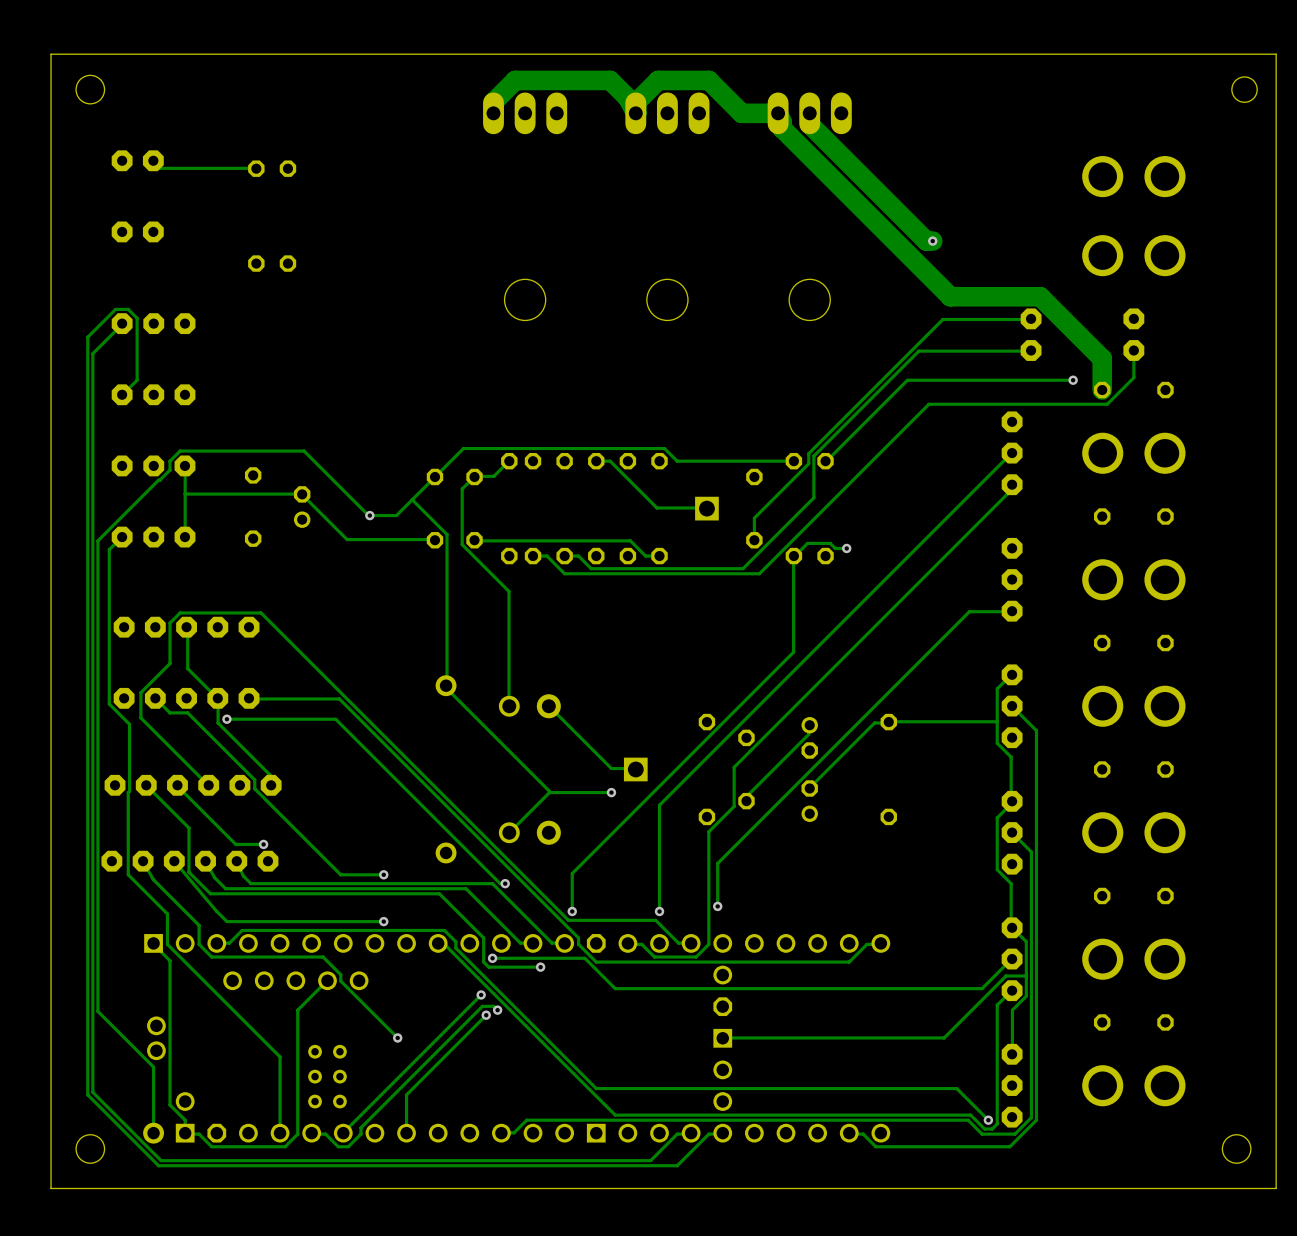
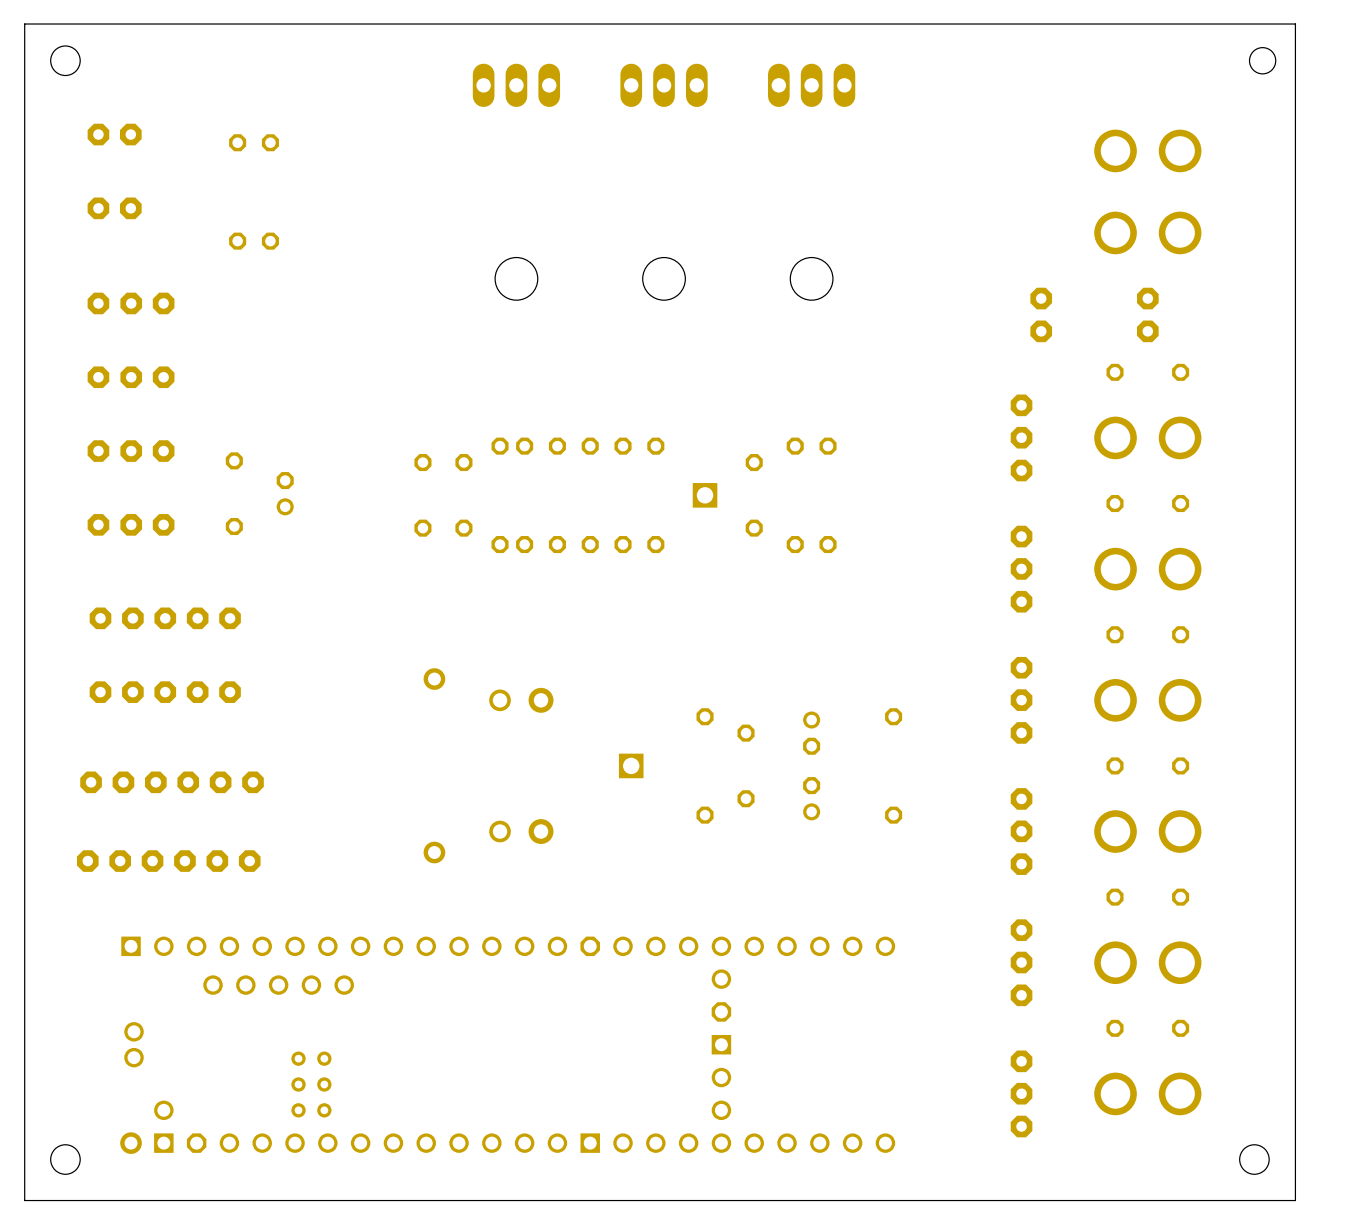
track: (493, 113) (493, 101) (515, 80) (610, 80) (627, 98) (635, 113) (636, 101) (658, 80) (708, 80) (741, 113) (778, 113) (782, 122) (782, 128) (950, 296) (1040, 296) (1102, 358) (1102, 390) -> none
track: (809, 113) (810, 124) (926, 241) (932, 241) -> none
track: (153, 160) (160, 168) (256, 168) -> none
via: (932, 241) -> none
track: (1031, 318) (942, 319) (808, 453) (808, 463) (754, 518) (754, 540) -> none
track: (122, 323) (92, 353) (92, 1092) (161, 1160) (650, 1160) (677, 1134) (691, 1133) -> none
track: (1031, 350) (918, 351) (813, 456) (813, 497) (743, 568) (591, 568) (578, 556) (564, 556) -> none
track: (1133, 350) (1133, 377) (1107, 404) (928, 404) (759, 573) (564, 573) (546, 556) (533, 556) -> none
track: (1073, 380) (907, 380) (825, 461) -> none
via: (1073, 380) -> none
track: (122, 394) (137, 380) (137, 318) (128, 309) (115, 309) (87, 337) (87, 1094) (158, 1165) (677, 1165) (708, 1134) (722, 1133) -> none
track: (1012, 453) (659, 805) (659, 911) -> none
track: (509, 461) (493, 476) (474, 476) (462, 489) (462, 544) (508, 591) (509, 706) -> none
track: (596, 461) (610, 461) (656, 507) (706, 508) -> none
track: (793, 461) (677, 461) (664, 448) (463, 448) (396, 515) (368, 515) (304, 451) (180, 451) (170, 461) (170, 470) (97, 540) (97, 1011) (153, 1067) (153, 1133) -> none
track: (184, 465) (185, 537) -> none
track: (1012, 484) (1011, 490) (734, 767) (734, 806) (708, 831) (708, 944) (696, 957) (654, 957) (641, 944) (627, 943) -> none
track: (185, 494) (301, 494) (347, 539) (435, 540) -> none
track: (412, 499) (447, 534) (447, 688) (549, 792) -> none
via: (369, 515) -> none
track: (121, 537) (109, 549) (109, 704) (129, 724) (128, 874) (167, 914) (167, 944) (280, 1056) (280, 1133) -> none
track: (474, 540) (630, 540) (645, 556) (659, 556) -> none
track: (846, 548) (835, 548) (830, 543) (807, 543) (793, 556) (793, 652) (572, 873) (572, 911) -> none
via: (846, 548) -> none
track: (1012, 611) (969, 611) (717, 863) (717, 906) -> none
track: (186, 627) (187, 668) (217, 698) (218, 723) (269, 774) (271, 785) -> none
track: (1012, 674) (997, 688) (997, 743) (1011, 757) (1012, 802) (997, 817) (997, 869) (1011, 883) (1011, 926) (1026, 941) (1026, 996) (1012, 1010) (1012, 1054) -> none
track: (155, 698) (170, 712) (187, 712) (254, 779) (254, 788) (340, 874) (383, 874) -> none
track: (249, 698) (339, 698) (578, 938) (578, 944) (596, 962) (849, 962) (866, 944) (880, 943) -> none
track: (548, 706) (611, 768) (635, 769) -> none
track: (1012, 706) (1036, 730) (1036, 1120) (1009, 1146) (875, 1146) (863, 1134) (849, 1133) -> none
track: (226, 719) (335, 719) (500, 883) (505, 883) -> none
via: (226, 719) -> none
track: (997, 721) (874, 723) (809, 788) -> none
track: (809, 725) (808, 734) (746, 796) (746, 801) -> none
track: (146, 785) (188, 828) (188, 872) (210, 893) (439, 893) (483, 938) (483, 962) (488, 967) (540, 967) -> none
track: (177, 785) (235, 844) (263, 844) -> none
track: (208, 785) (140, 717) (140, 692) (170, 663) (170, 623) (180, 612) (261, 612) (568, 920) (655, 920) (678, 943) (691, 943) -> none
track: (549, 792) (509, 832) -> none
track: (611, 792) (549, 792) -> none
via: (611, 792) -> none
track: (1012, 832) (1031, 852) (1031, 1117) (1014, 1134) (982, 1134) (968, 1120) (526, 1120) (514, 1132) (501, 1133) -> none
via: (263, 844) -> none
track: (143, 861) (153, 879) (199, 925) (199, 944) (211, 957) (323, 957) (340, 974) (340, 981) (397, 1037) -> none
track: (174, 861) (226, 921) (383, 921) -> none
track: (205, 861) (214, 877) (225, 888) (465, 888) (520, 943) (533, 943) -> none
track: (236, 861) (243, 876) (250, 883) (492, 883) (552, 943) (564, 943) -> none
via: (383, 874) -> none
via: (505, 883) -> none
via: (717, 906) -> none
via: (572, 911) -> none
via: (659, 911) -> none
via: (383, 921) -> none
track: (153, 943) (170, 960) (170, 1105) (185, 1120) (185, 1133) (199, 1134) (211, 1146) (285, 1146) (297, 1134) (297, 1010) (327, 980) -> none
track: (216, 943) (229, 943) (242, 930) (444, 930) (455, 941) (455, 948) (596, 1088) (956, 1088) (988, 1120) -> none
track: (438, 943) (444, 944) (615, 1115) (970, 1115) (984, 1129) (992, 1129) (997, 1123) (997, 1005) (1012, 990) -> none
track: (492, 958) (584, 958) (615, 988) (982, 988) (1012, 959) -> none
via: (492, 958) -> none
via: (540, 967) -> none
track: (1026, 975) (1006, 975) (944, 1037) (722, 1038) -> none
track: (481, 994) (343, 1133) -> none
via: (481, 994) -> none
track: (497, 1010) (493, 1006) (482, 1006) (361, 1127) (361, 1134) (348, 1146) (338, 1146) (325, 1134) (311, 1133) -> none
via: (497, 1010) -> none
track: (486, 1015) (406, 1094) (406, 1133) -> none
via: (486, 1015) -> none
via: (397, 1037) -> none
via: (988, 1120) -> none

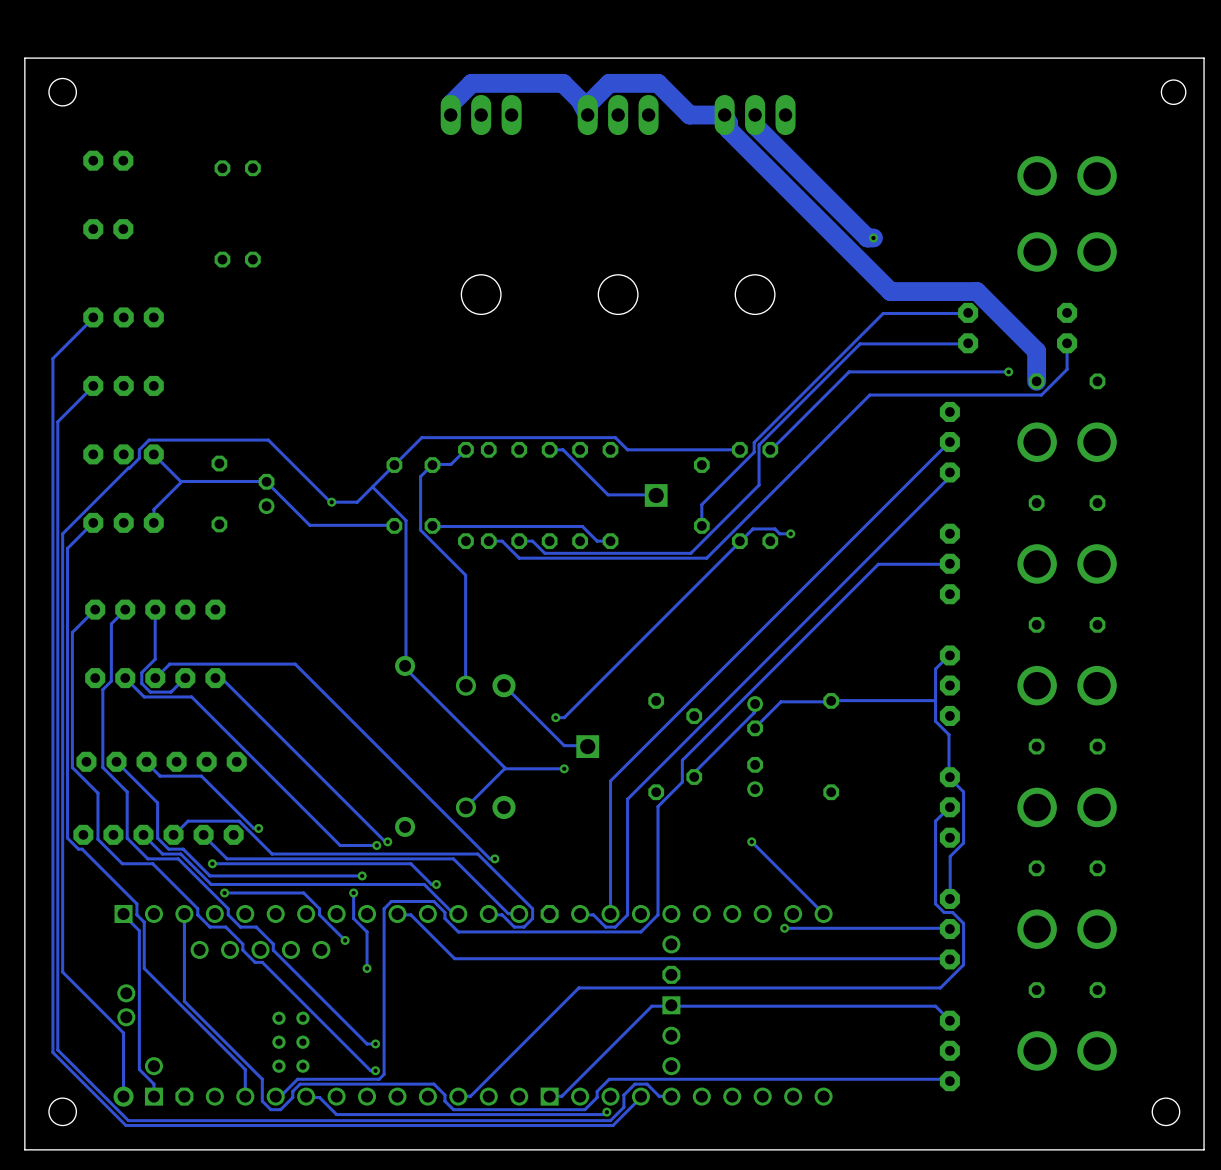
track: none -> (450, 115) (451, 104) (471, 83) (563, 83) (580, 100) (587, 115) (588, 104) (609, 83) (658, 83) (689, 115) (724, 115) (728, 123) (728, 129) (890, 291) (976, 291) (1036, 351) (1036, 381)
track: none -> (755, 115) (755, 125) (867, 237) (873, 237)
via: none -> (873, 237)
track: none -> (968, 312) (883, 313) (754, 442) (754, 452) (701, 504) (701, 525)
track: none -> (93, 317) (52, 358) (52, 1052) (125, 1125) (612, 1125) (640, 1096)
track: none -> (968, 343) (860, 343) (759, 444) (759, 485) (690, 553) (544, 553) (532, 541) (519, 541)
track: none -> (1067, 343) (1067, 369) (1041, 395) (869, 395) (706, 558) (519, 558) (502, 541) (488, 541)
track: none -> (1008, 371) (849, 371) (770, 449)
via: none -> (1008, 371)
track: none -> (93, 385) (57, 421) (57, 1050) (128, 1120) (610, 1120) (623, 1107) (623, 1095) (634, 1084) (647, 1084) (659, 1096) (671, 1096)
track: none -> (949, 442) (610, 780) (610, 913)
track: none -> (465, 449) (451, 464) (432, 464) (420, 476) (420, 530) (465, 575) (465, 685)
track: none -> (549, 449) (563, 449) (608, 494) (656, 495)
track: none -> (739, 449) (627, 449) (615, 437) (421, 437) (357, 502) (330, 502) (268, 440) (149, 440) (139, 449) (139, 458) (62, 533) (62, 972) (123, 1032) (123, 1096)
track: none -> (153, 454) (180, 481)
track: none -> (949, 472) (948, 477) (627, 799) (627, 914) (615, 927) (605, 927) (593, 914) (580, 913)
track: none -> (180, 481) (265, 481) (309, 525) (394, 525)
track: none -> (180, 481) (153, 509) (153, 522)
track: none -> (372, 486) (405, 520) (405, 668) (504, 768)
via: none -> (331, 502)
track: none -> (93, 522) (67, 548) (67, 838) (78, 849) (82, 849) (136, 903) (136, 914) (144, 922) (144, 968) (245, 1069) (245, 1096)
track: none -> (432, 525) (582, 526) (597, 541) (610, 541)
track: none -> (790, 533) (779, 533) (774, 528) (752, 528) (564, 717) (555, 717)
via: none -> (790, 533)
track: none -> (949, 563) (878, 564) (682, 760) (682, 782) (658, 806) (658, 914) (640, 931) (458, 931) (444, 918) (444, 912) (433, 901) (391, 901) (384, 908) (384, 1074) (379, 1079) (297, 1079) (280, 1096) (275, 1096)
track: none -> (95, 609) (72, 632) (72, 767) (97, 793) (97, 839) (122, 863) (152, 863) (197, 908) (197, 914) (209, 927) (225, 927) (242, 944) (242, 950) (255, 962) (262, 962) (370, 1070) (375, 1070)
track: none -> (125, 609) (111, 623) (111, 681) (102, 689) (102, 767) (127, 791) (127, 838) (147, 858) (178, 858) (228, 908) (228, 914) (240, 927) (256, 927) (273, 944) (273, 950) (367, 1043) (375, 1043)
track: none -> (155, 609) (155, 659) (141, 672) (141, 683) (150, 692) (171, 692) (185, 678)
track: none -> (949, 655) (935, 668) (935, 721) (948, 734) (948, 776) (963, 791) (963, 843) (950, 856) (949, 898)
track: none -> (125, 678) (144, 696) (191, 696) (340, 845) (376, 845)
track: none -> (155, 678) (169, 664) (295, 664) (489, 858) (494, 858)
track: none -> (215, 678) (222, 678) (385, 841) (387, 841)
track: none -> (503, 685) (564, 745) (587, 746)
track: none -> (935, 700) (780, 701) (755, 728)
track: none -> (755, 703) (754, 712) (694, 772) (694, 777)
via: none -> (555, 717)
track: none -> (116, 761) (157, 802) (157, 838) (168, 849) (183, 849) (209, 875) (362, 875)
track: none -> (146, 761) (160, 776) (201, 776) (253, 828) (258, 828)
track: none -> (504, 768) (465, 807)
track: none -> (564, 768) (504, 768)
via: none -> (564, 768)
track: none -> (949, 807) (935, 821) (935, 903) (944, 912) (952, 912) (963, 923) (963, 964) (940, 987) (578, 987) (470, 1096) (458, 1096)
via: none -> (258, 828)
track: none -> (143, 834) (162, 854) (180, 854) (211, 884) (424, 884) (453, 913) (458, 913)
track: none -> (173, 834) (188, 821) (239, 821) (272, 854) (477, 854) (532, 908) (532, 918) (524, 927) (514, 927) (502, 914) (488, 913)
track: none -> (203, 834) (227, 858) (453, 858) (508, 913) (519, 913)
via: none -> (387, 841)
track: none -> (751, 841) (823, 913)
via: none -> (751, 841)
via: none -> (376, 845)
via: none -> (494, 858)
track: none -> (212, 863) (410, 863) (431, 884) (436, 884)
via: none -> (212, 863)
via: none -> (362, 875)
via: none -> (436, 884)
track: none -> (224, 892) (303, 892) (319, 908) (319, 914) (345, 940)
via: none -> (224, 892)
track: none -> (353, 892) (353, 918) (367, 931) (367, 968)
via: none -> (353, 892)
track: none -> (123, 913) (139, 930) (139, 1069) (153, 1084) (153, 1096)
track: none -> (184, 913) (184, 1001) (262, 1079) (262, 1101) (270, 1109) (280, 1109) (292, 1097) (292, 1091) (300, 1084) (433, 1084) (444, 1095) (444, 1101) (453, 1109) (584, 1109) (597, 1097) (597, 1091) (609, 1079) (947, 1079) (949, 1081)
track: none -> (397, 913) (410, 914) (454, 958) (949, 959)
track: none -> (784, 928) (949, 929)
via: none -> (784, 928)
via: none -> (345, 940)
via: none -> (367, 968)
track: none -> (949, 1020) (935, 1006) (651, 1006) (561, 1096) (549, 1096)
via: none -> (375, 1043)
via: none -> (375, 1070)
track: none -> (306, 1096) (319, 1097) (336, 1114) (604, 1114) (606, 1112)
via: none -> (606, 1112)

